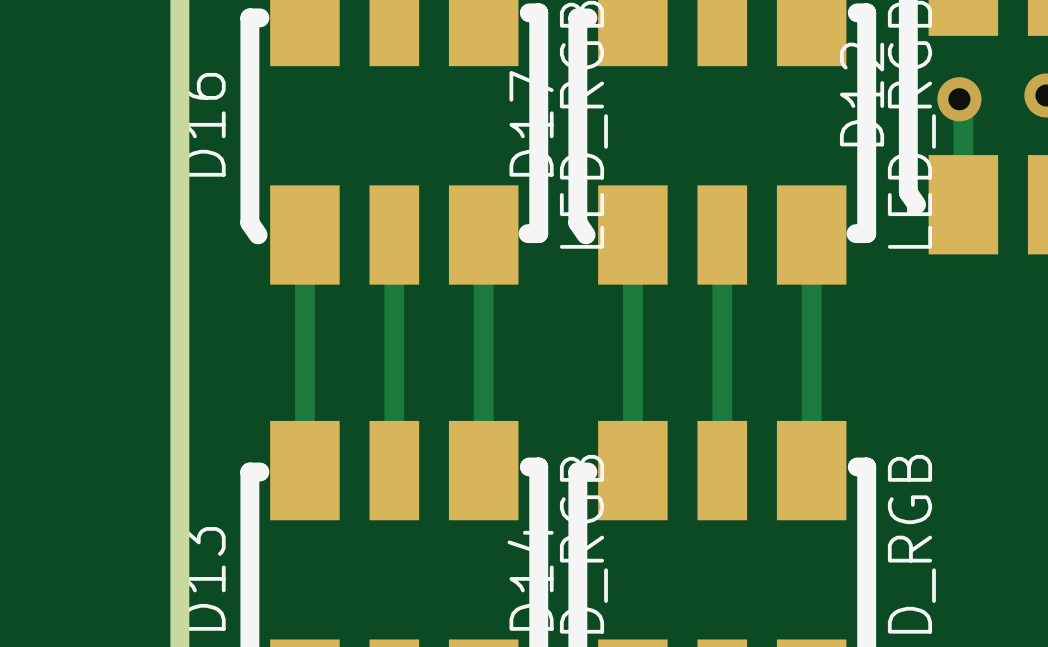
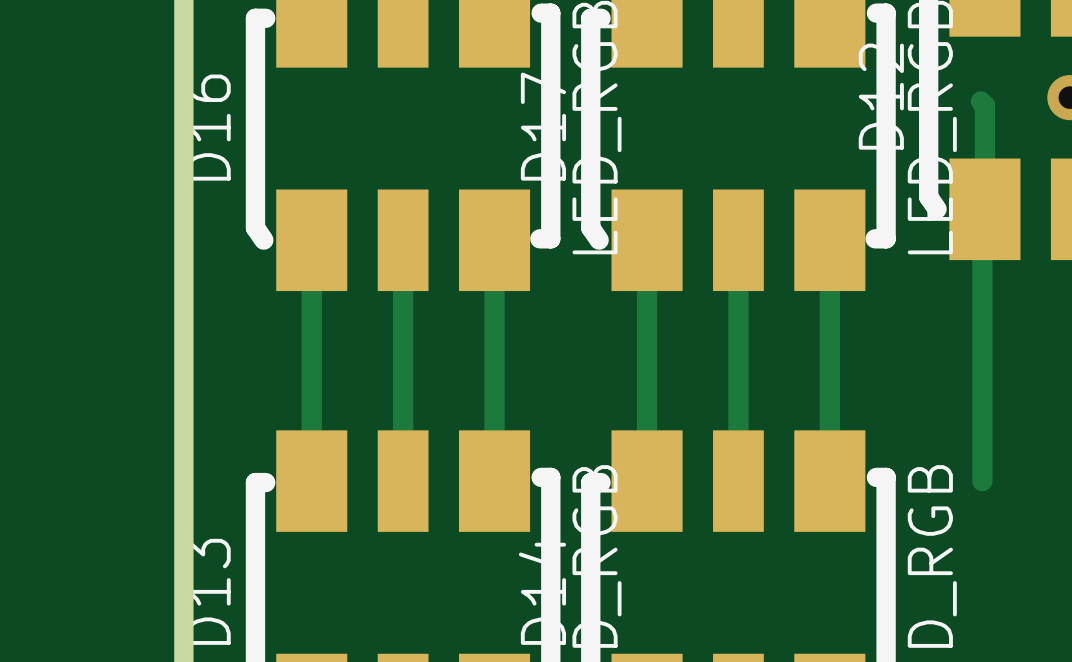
via: (959, 99) -> none
track: none -> (982, 240) (982, 481)

